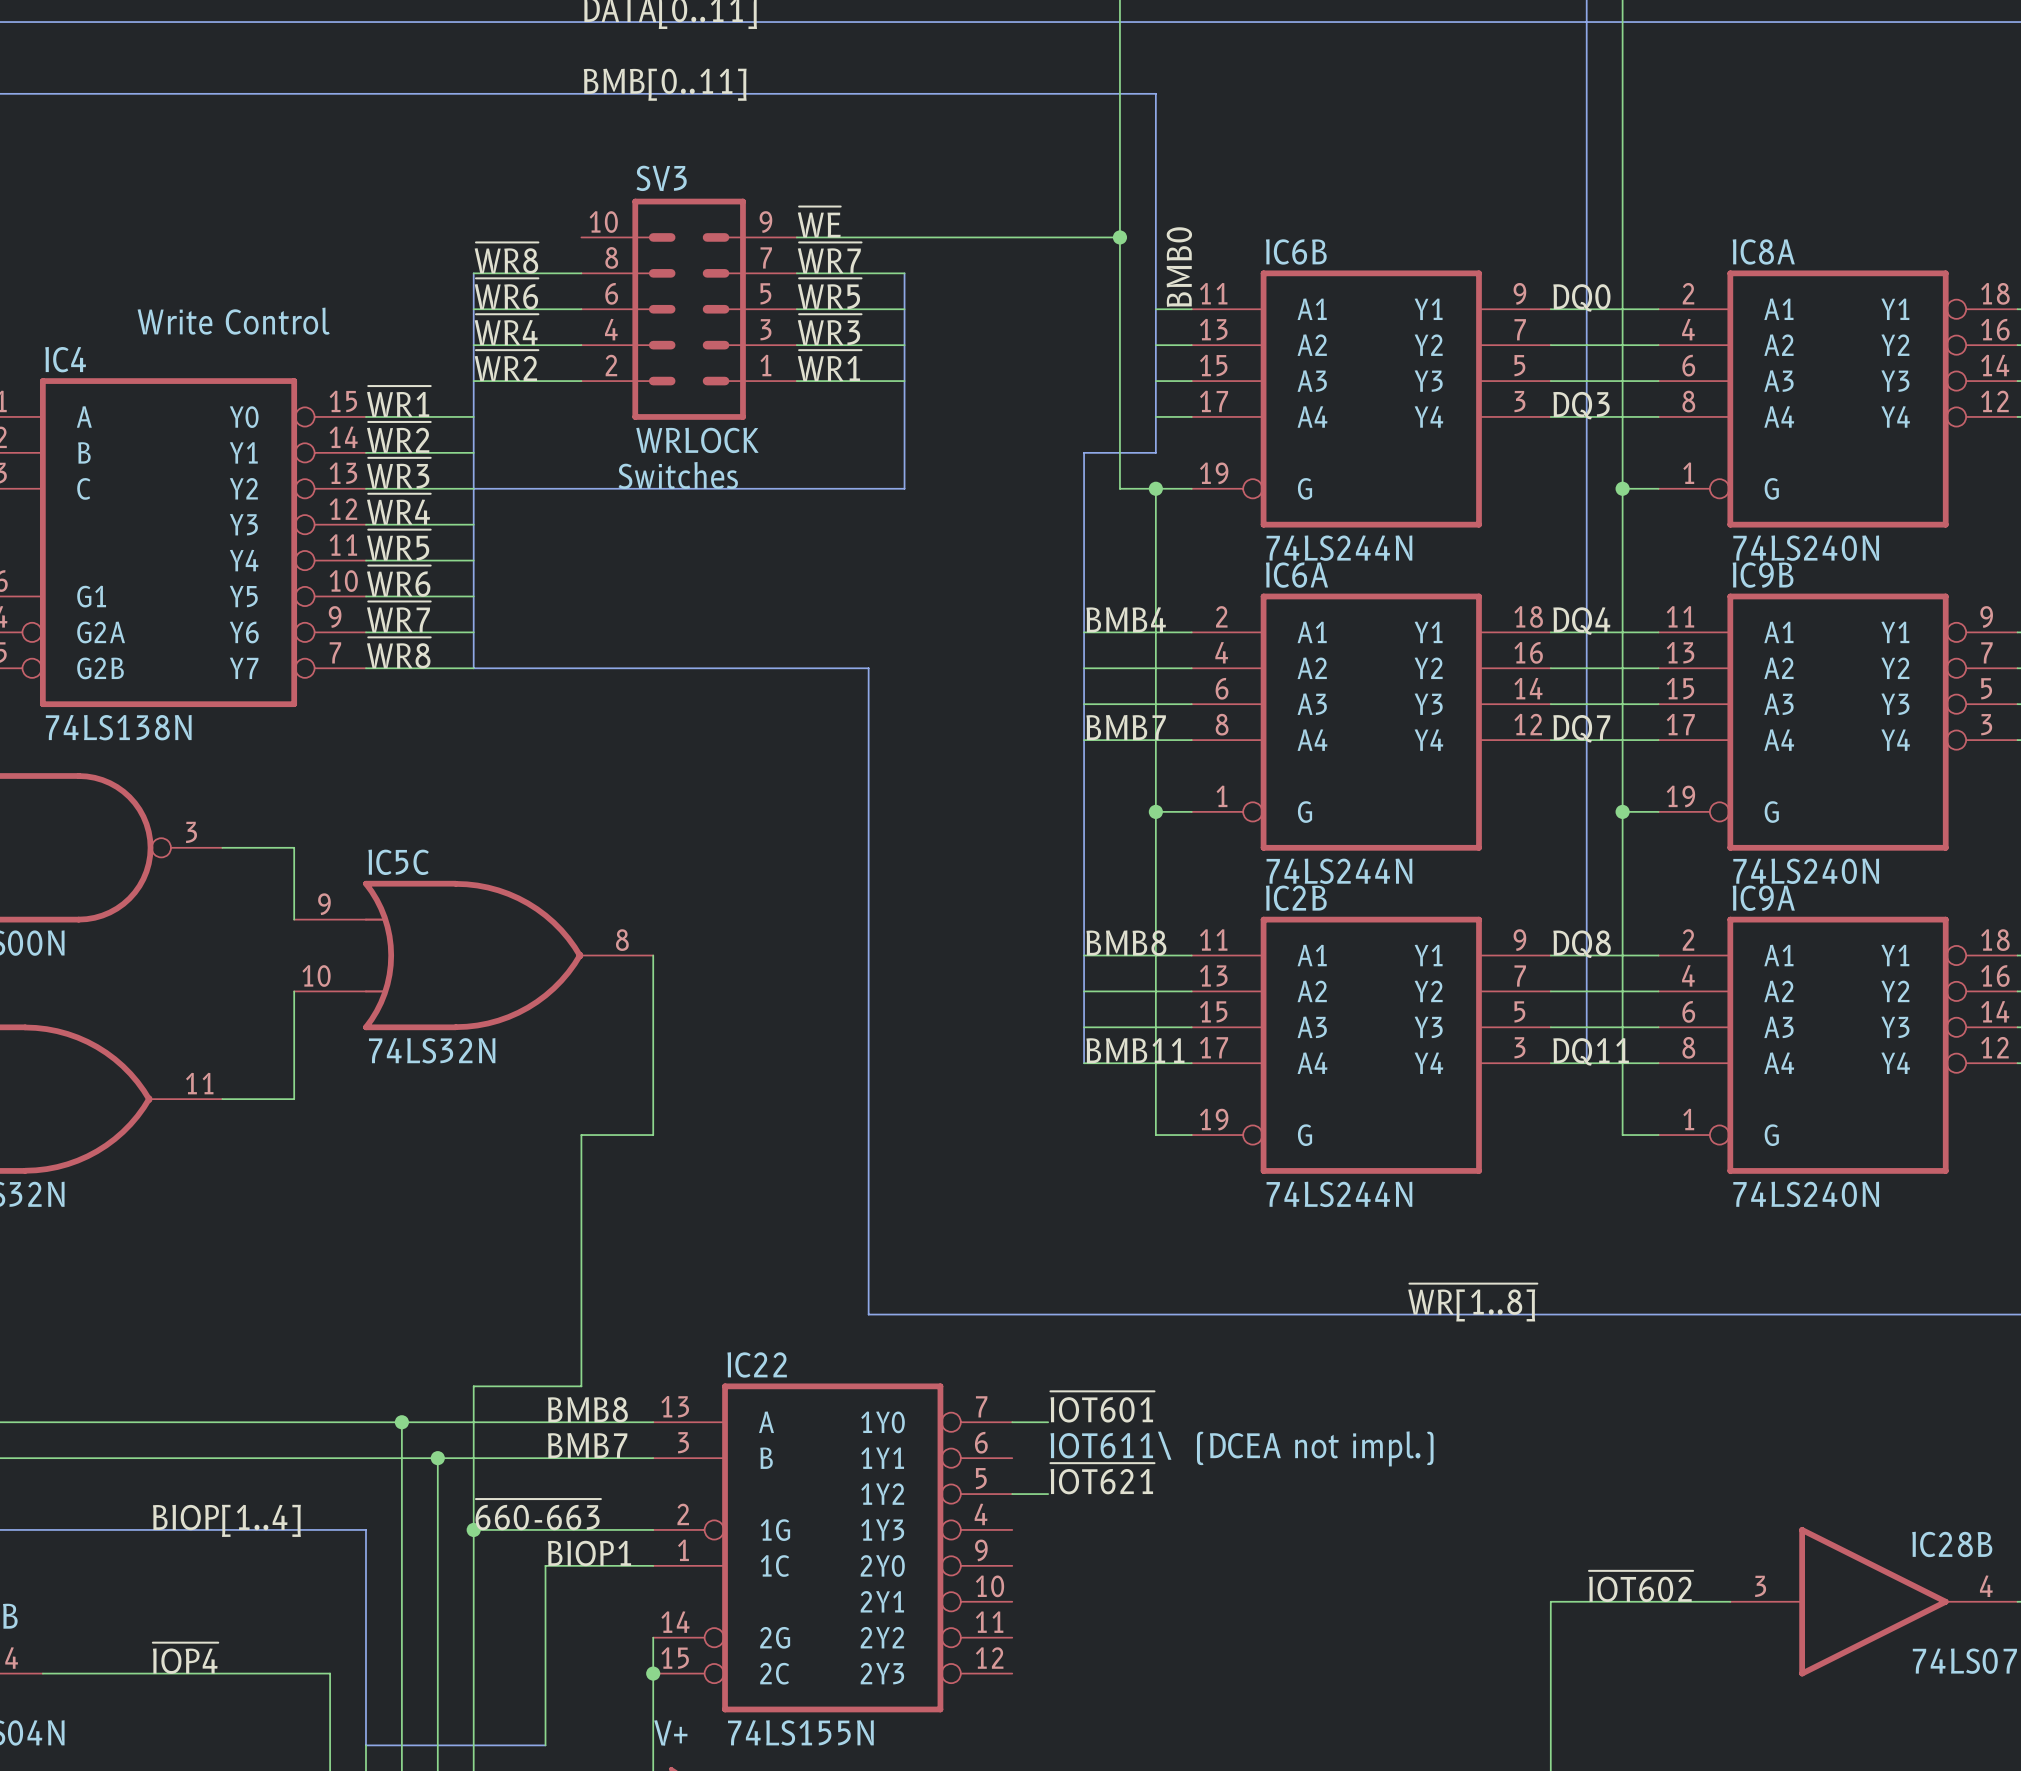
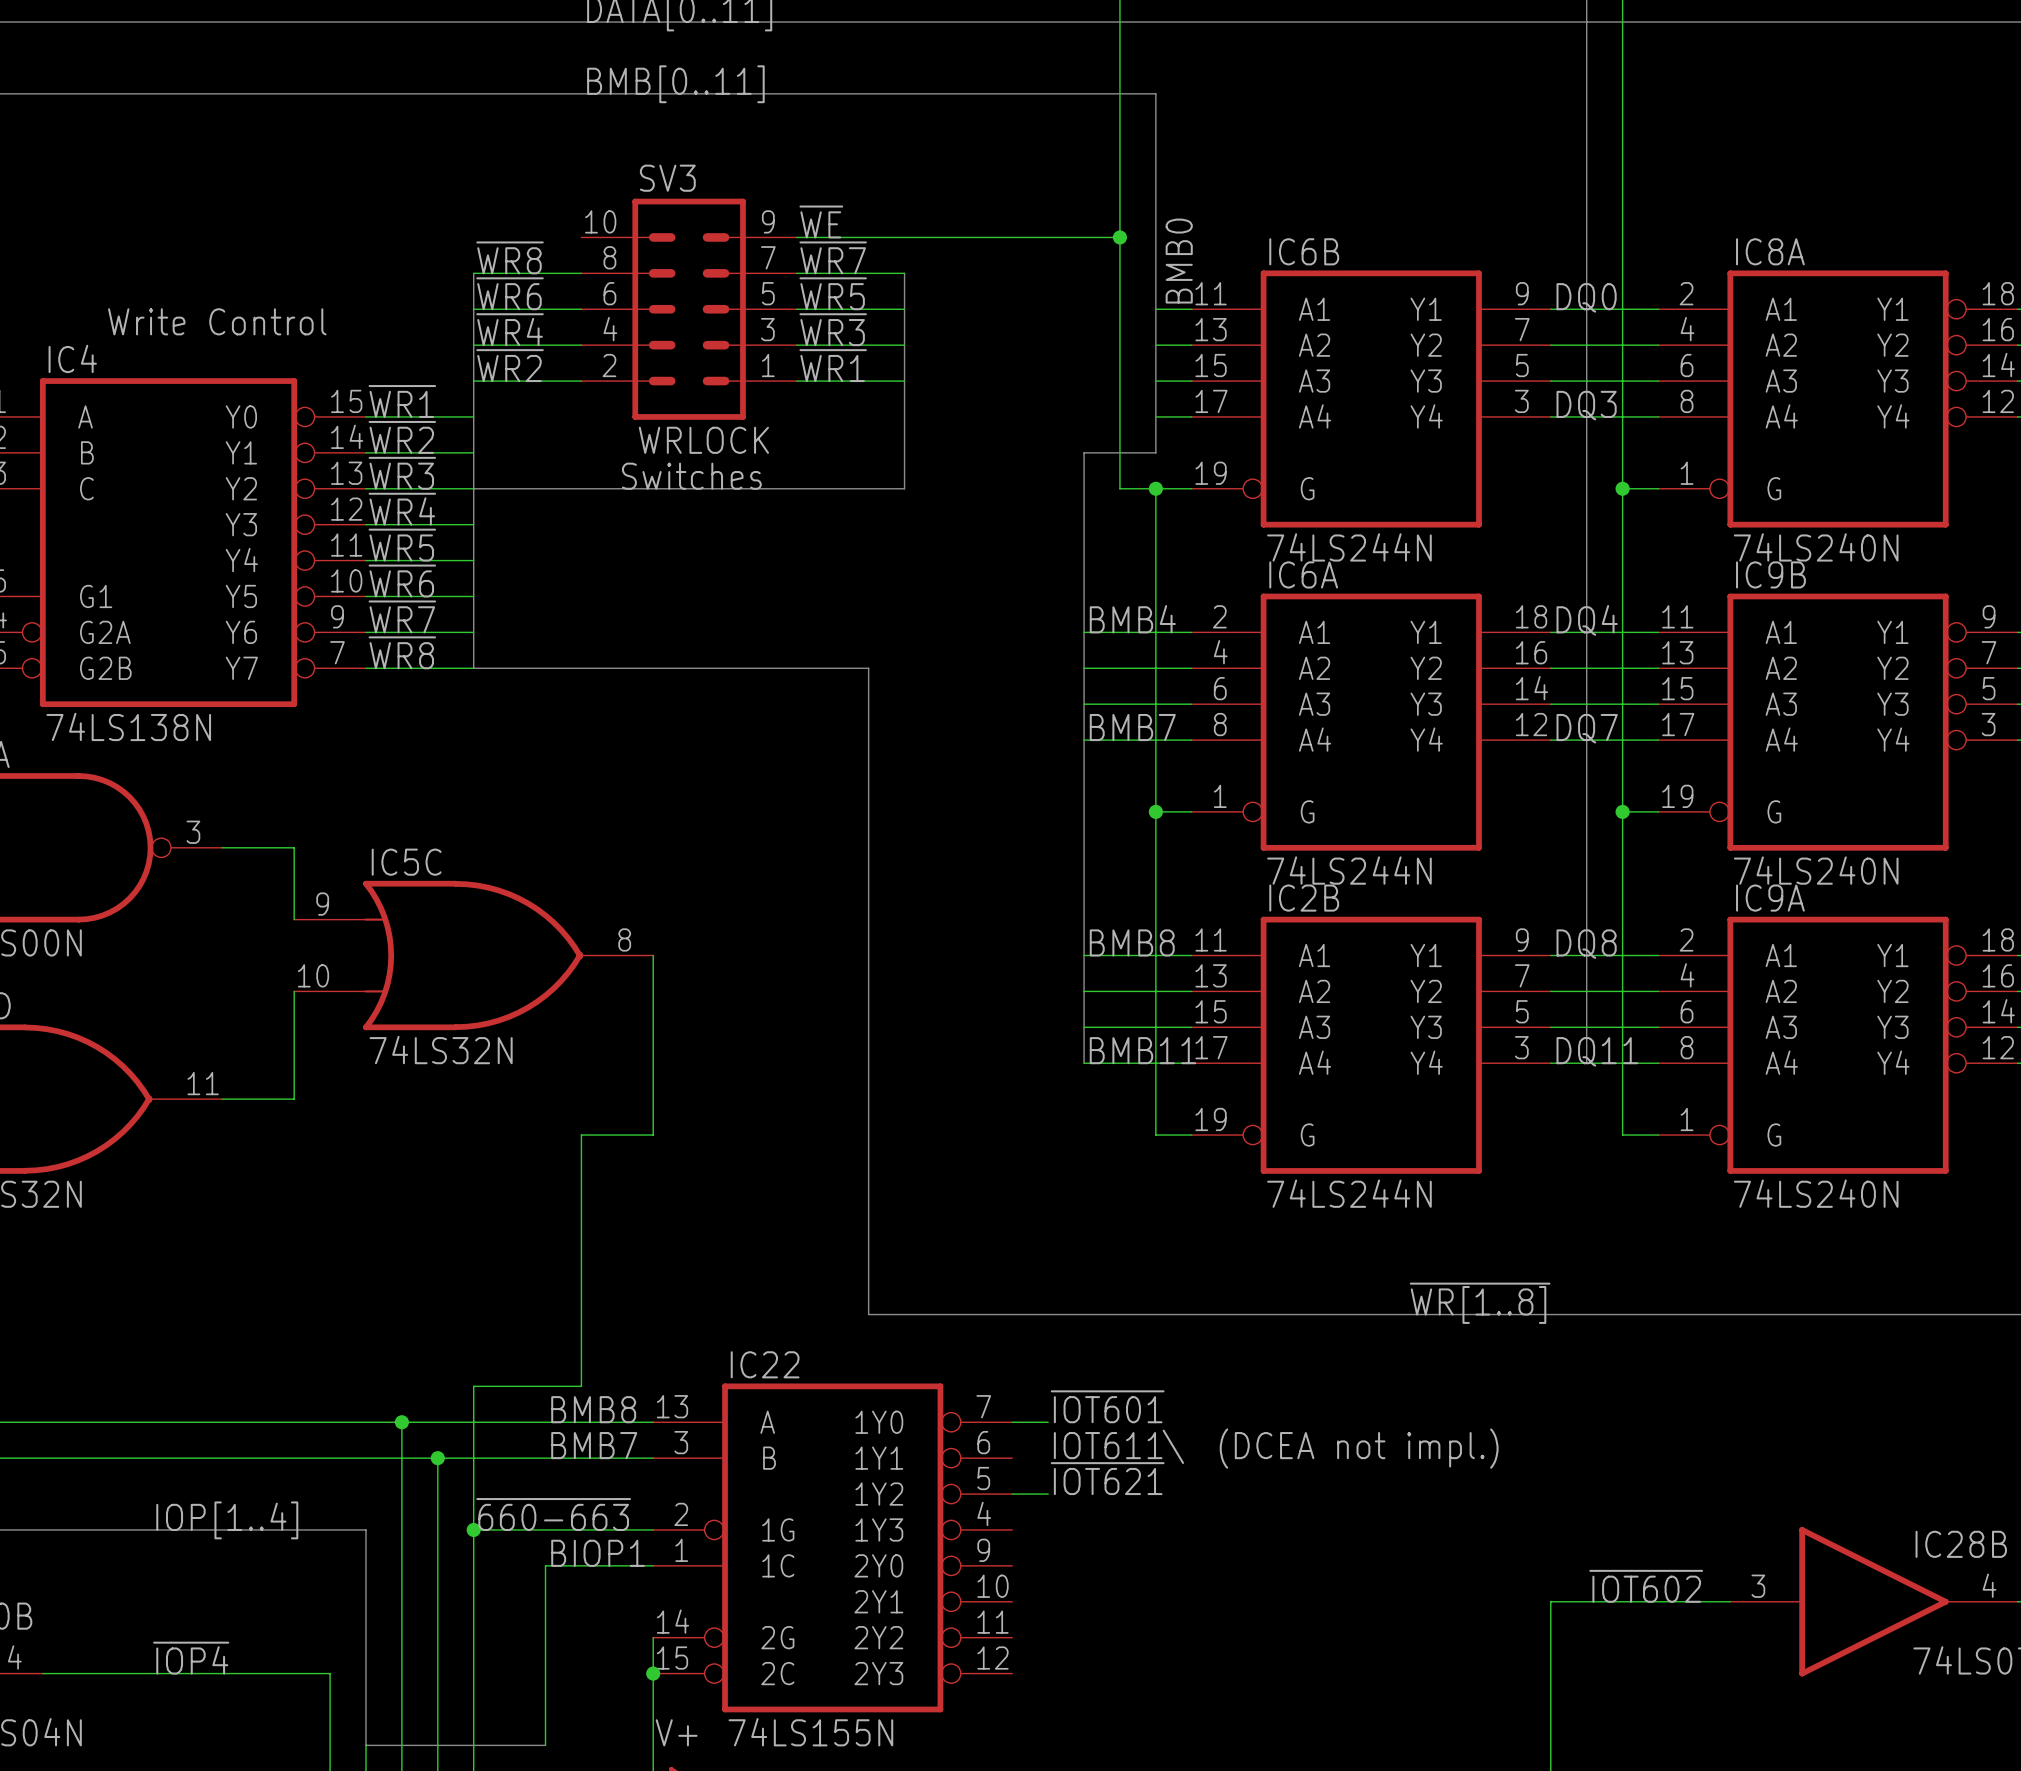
label: BIOP[1..4] (226, 1520) -> IOP[1..4] (227, 1520)

